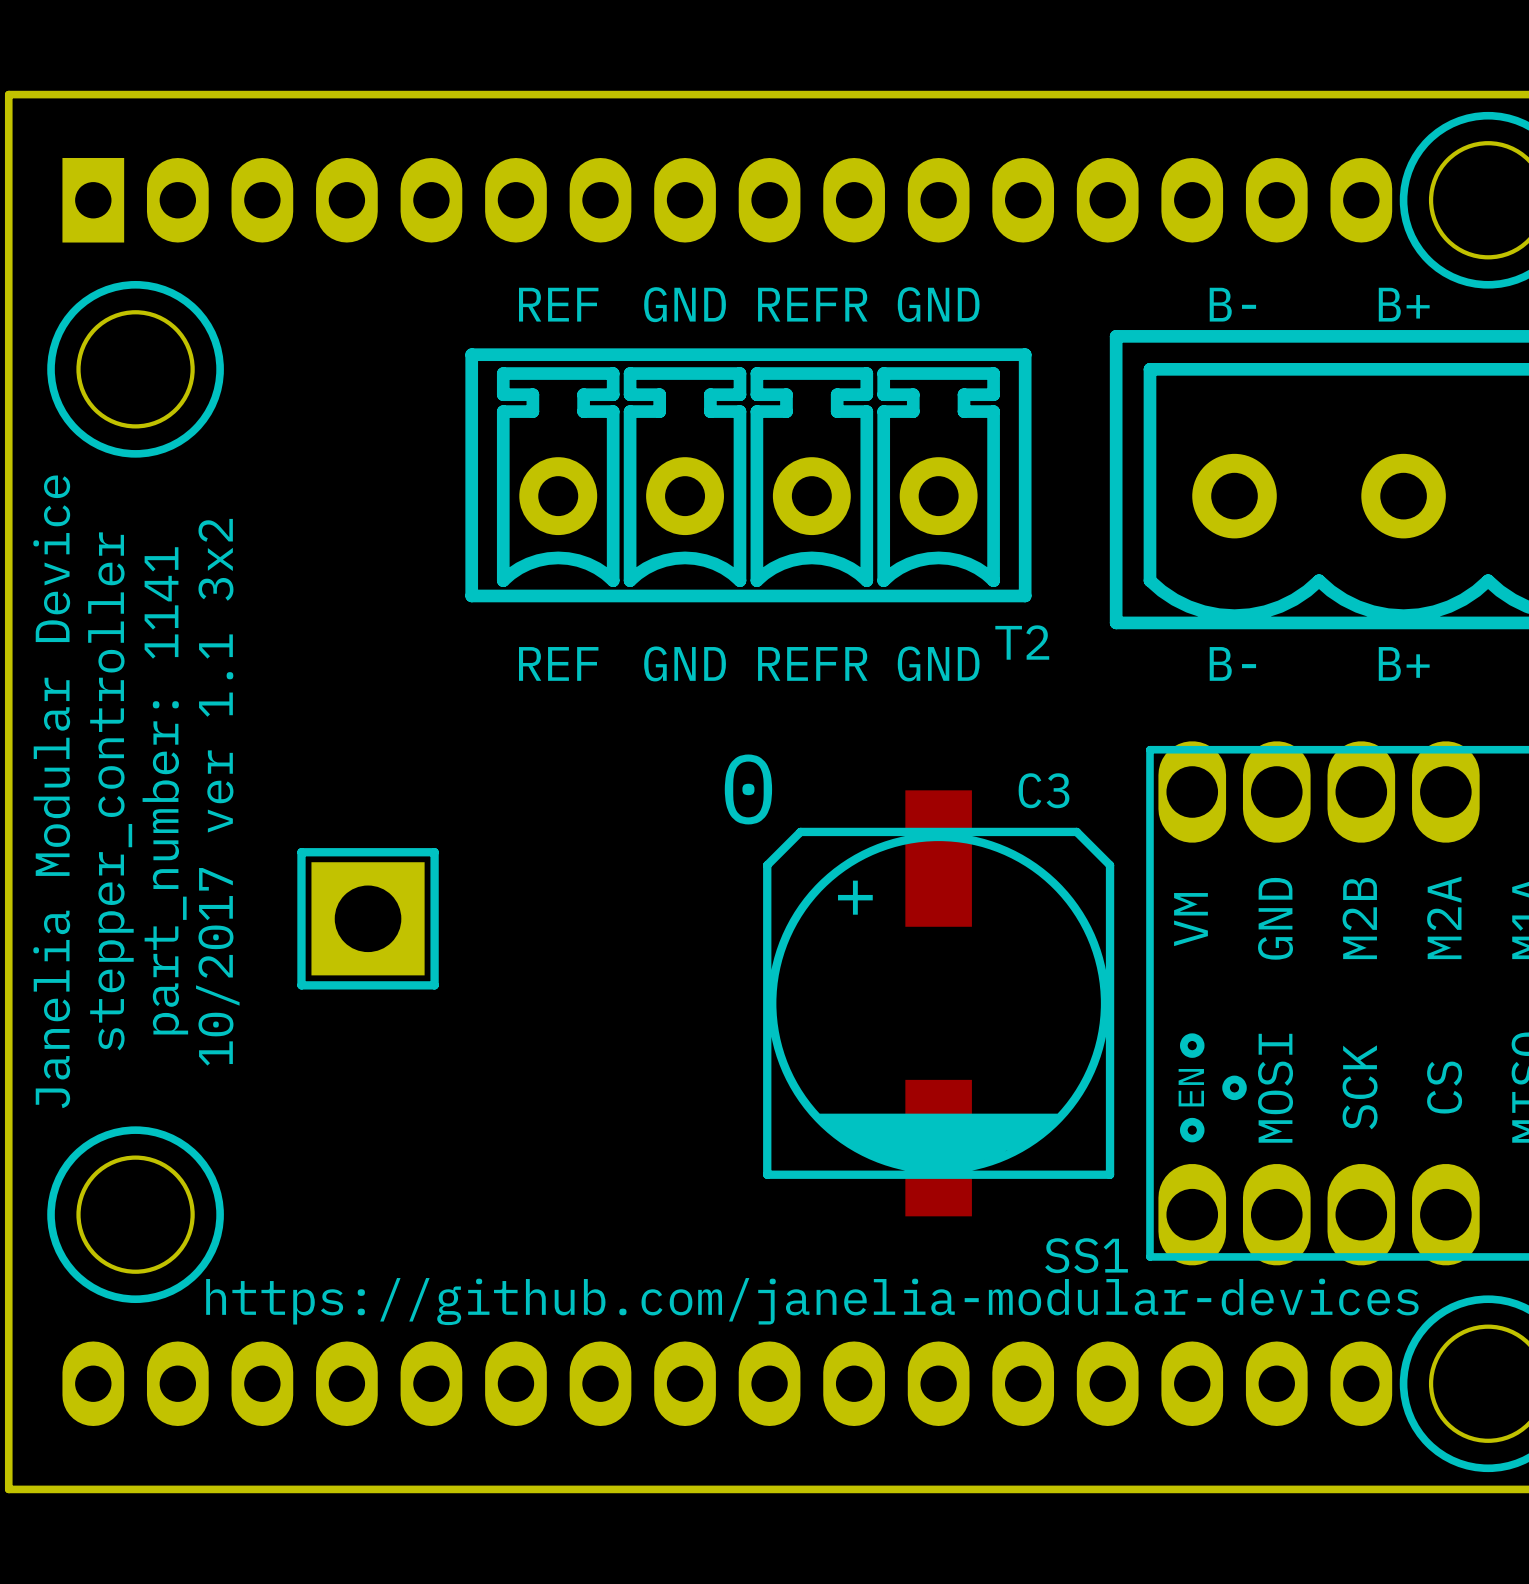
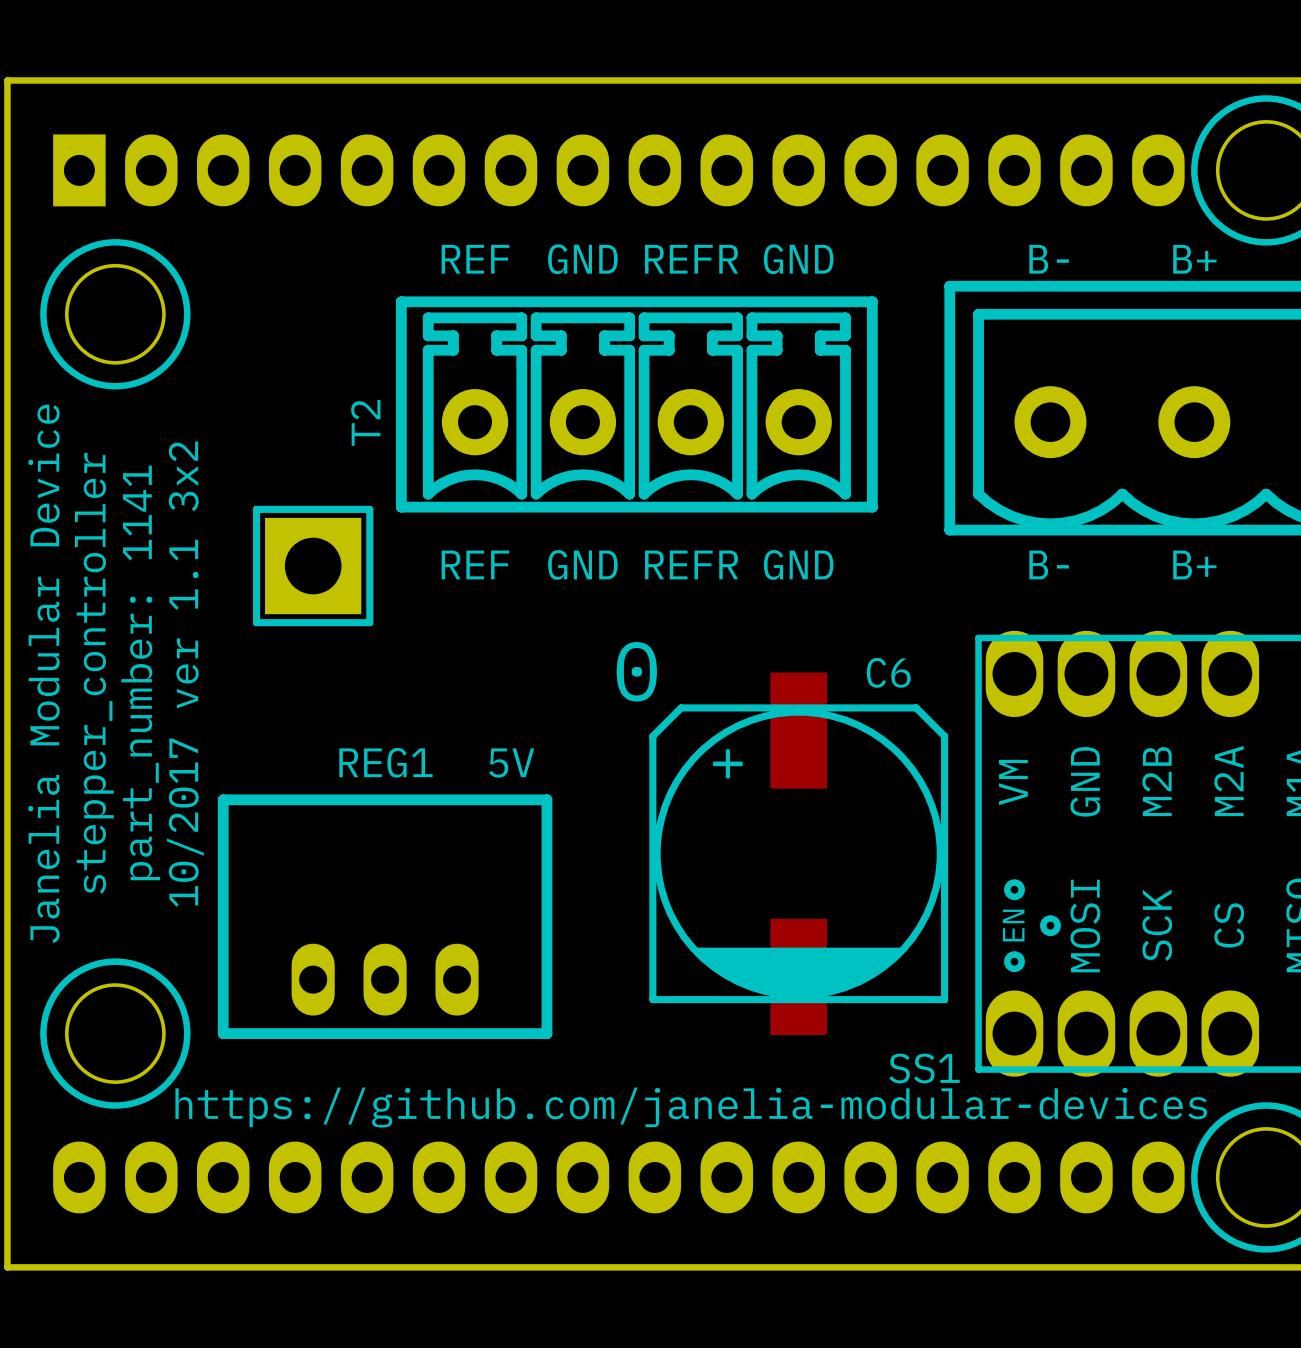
T2 name rotation: 0° (1022, 642) -> 90° counterclockwise (365, 422)
T2 name position: T2 (1022, 642) -> T2 (365, 422)
C3 name: C3 (1044, 790) -> C6 (888, 672)
text: none -> 5V (511, 763)
part position: (368, 918) -> (313, 566)
REG1: none -> (385, 916)

